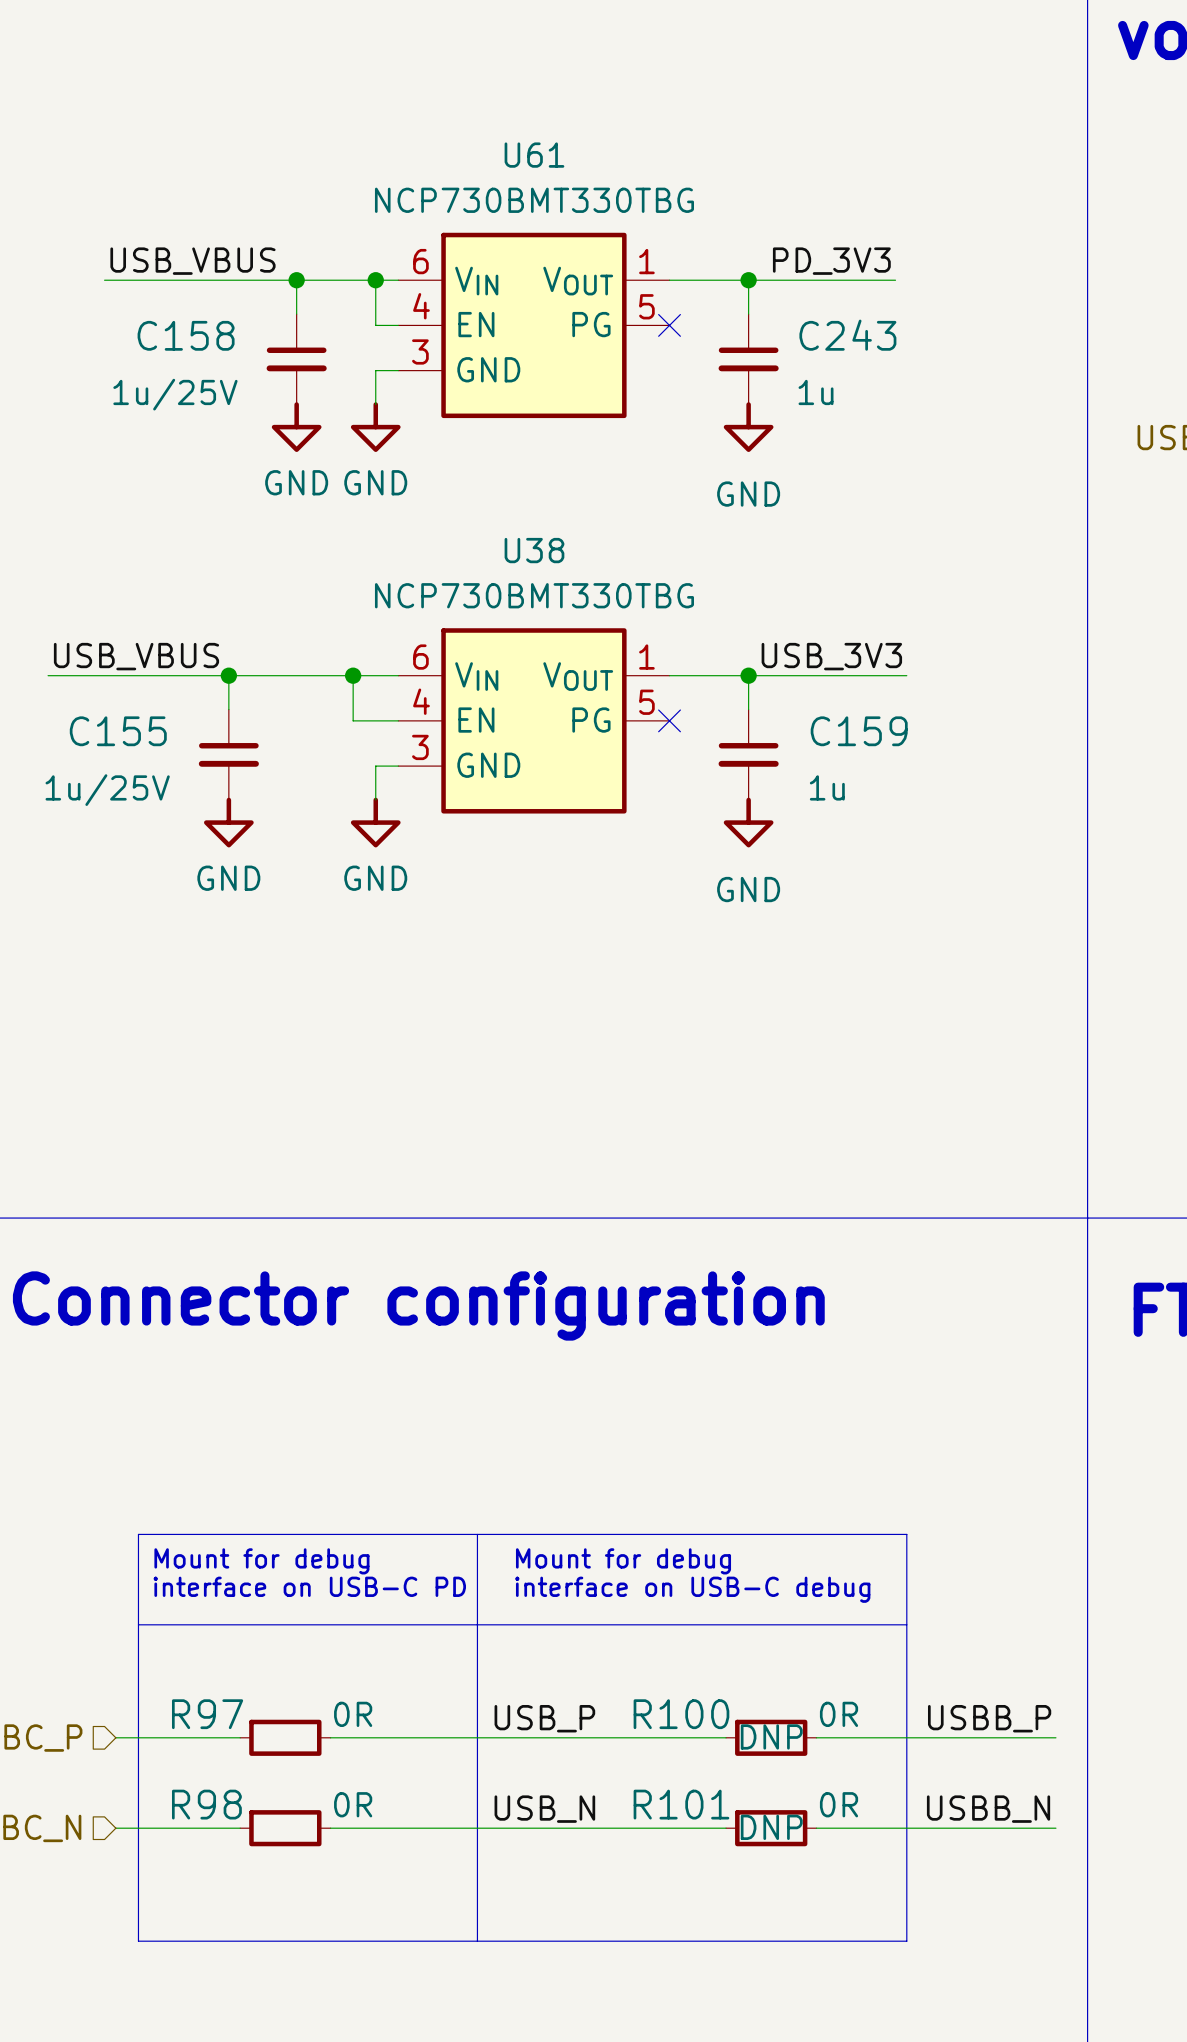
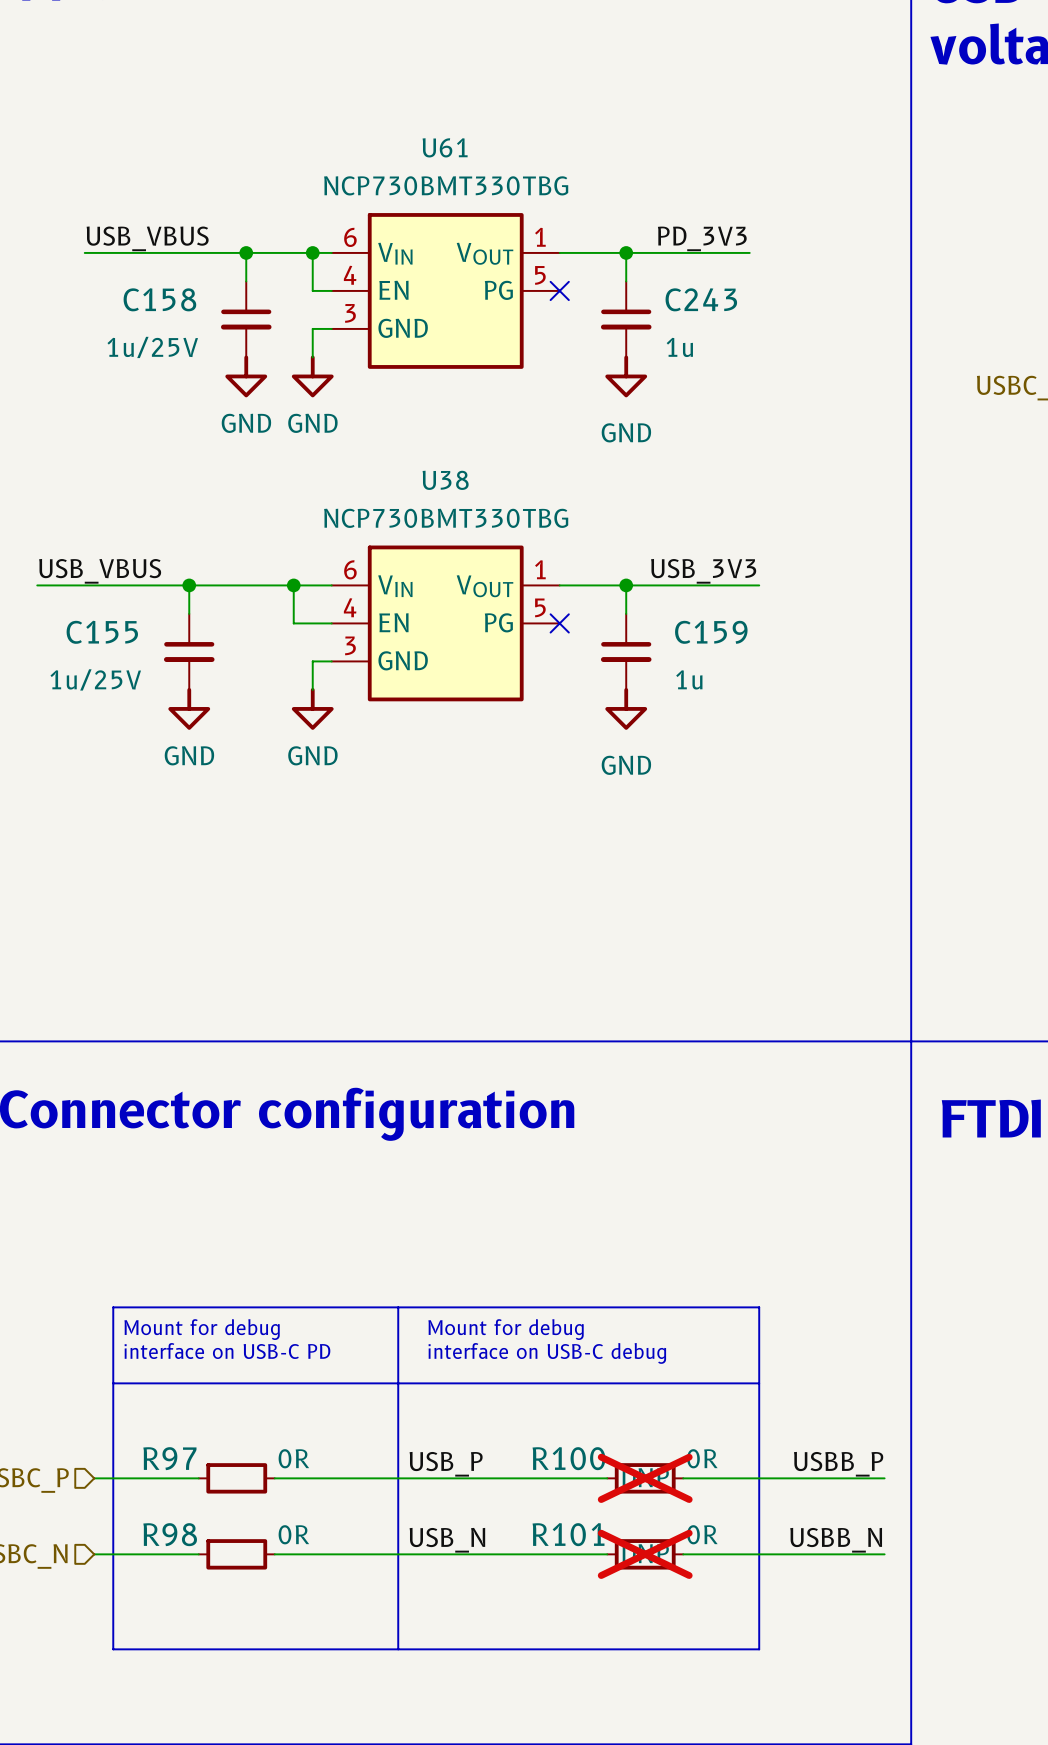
R100 do-not-place cross: none -> (645, 1478)
R101 do-not-place cross: none -> (645, 1554)

